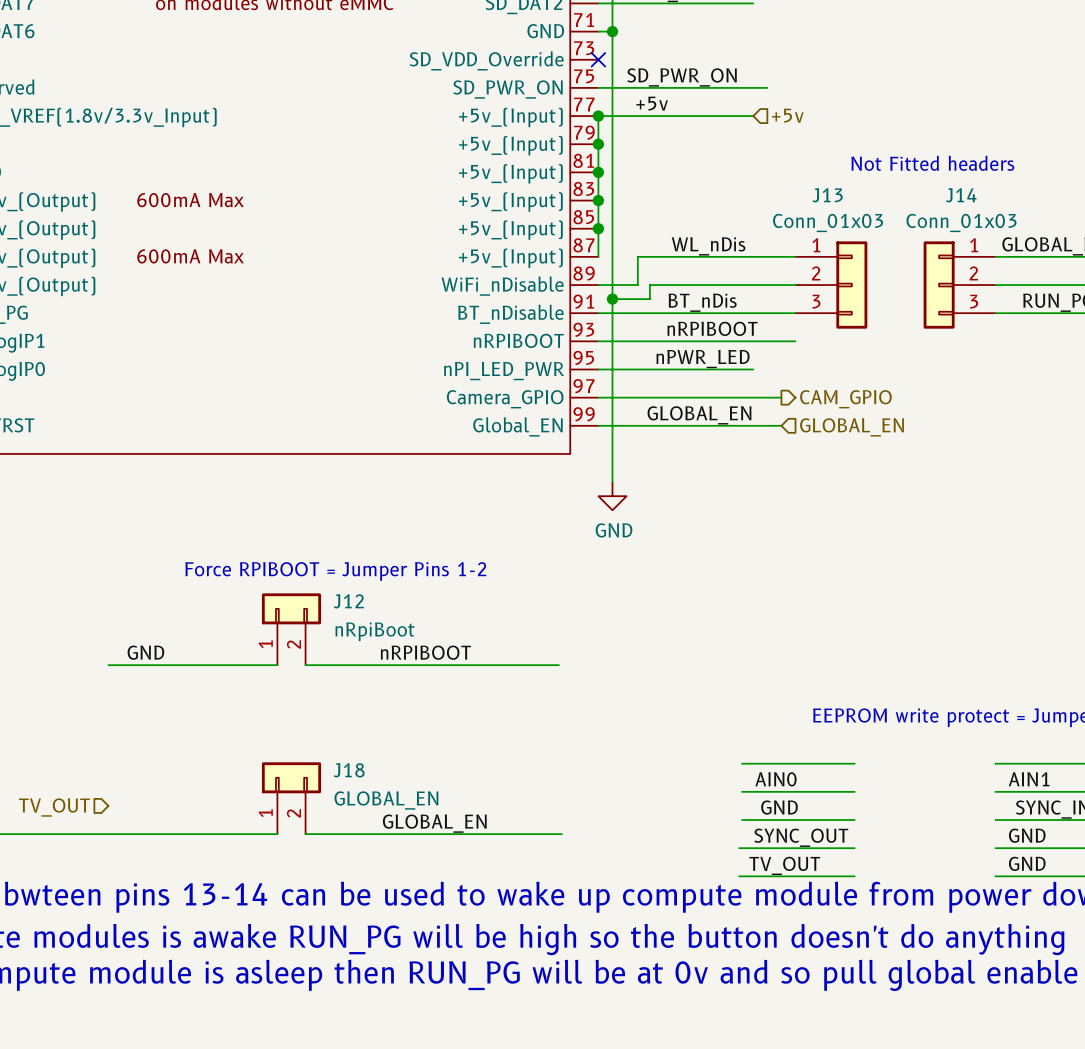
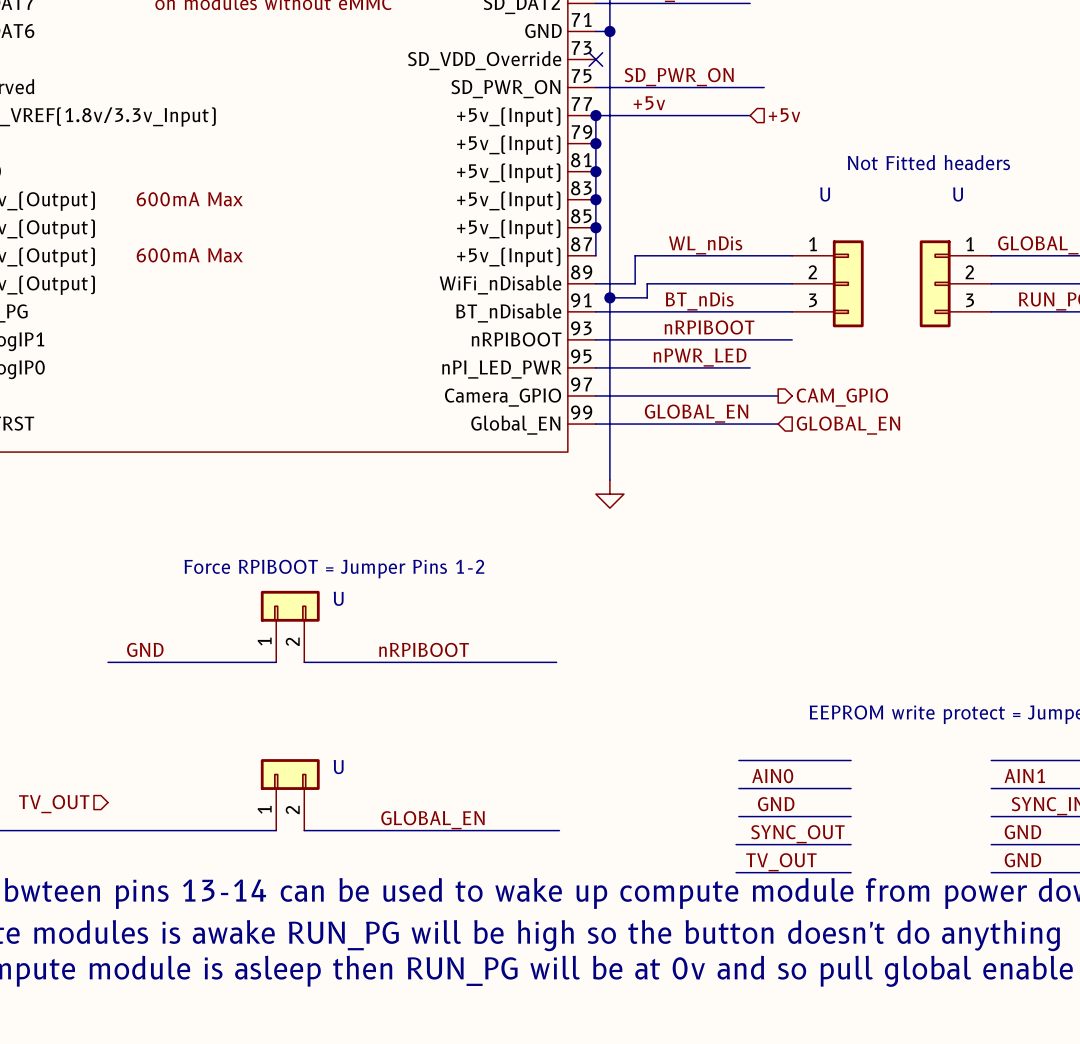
J13 name: J13 (827, 195) -> U (825, 194)
J14 name: J14 (961, 195) -> U (958, 194)
J13 value: Conn_01x03 (828, 222) -> none
J14 value: Conn_01x03 (961, 222) -> none
power symbol text: GND (614, 530) -> none
J12 name: J12 (348, 601) -> U (338, 598)
J12 value: nRpiBoot (375, 631) -> none
J18 name: J18 (349, 770) -> U (338, 767)
J18 value: GLOBAL_EN (386, 800) -> none

